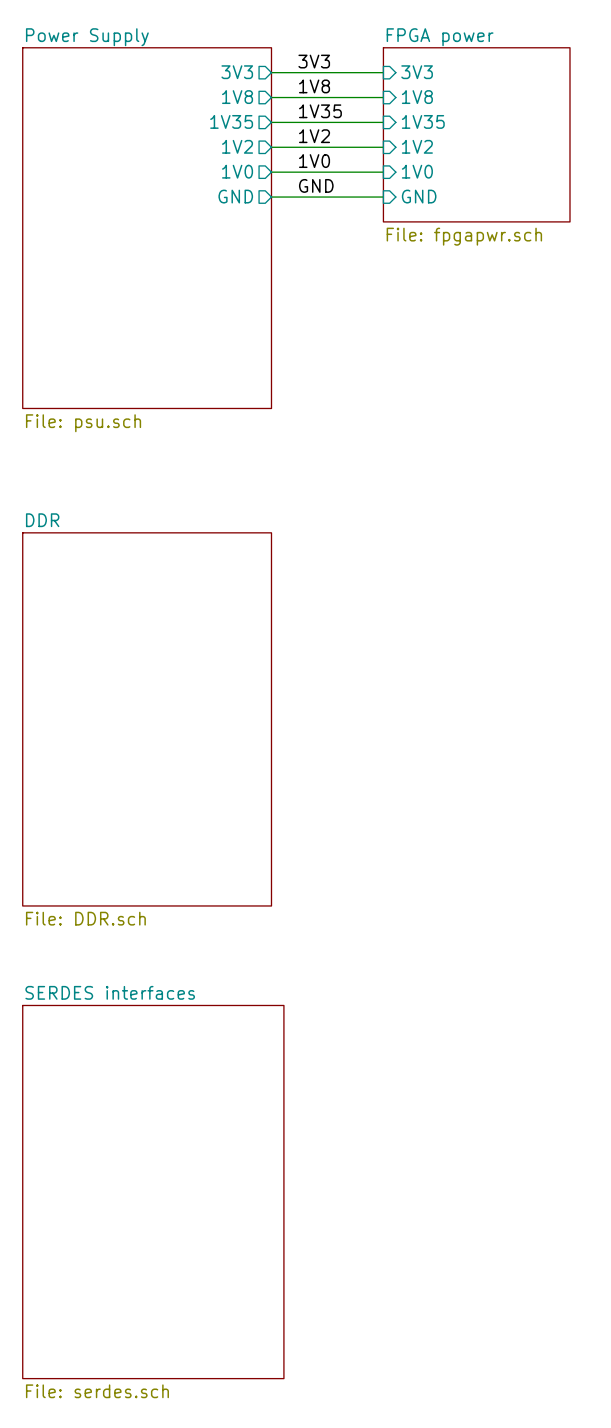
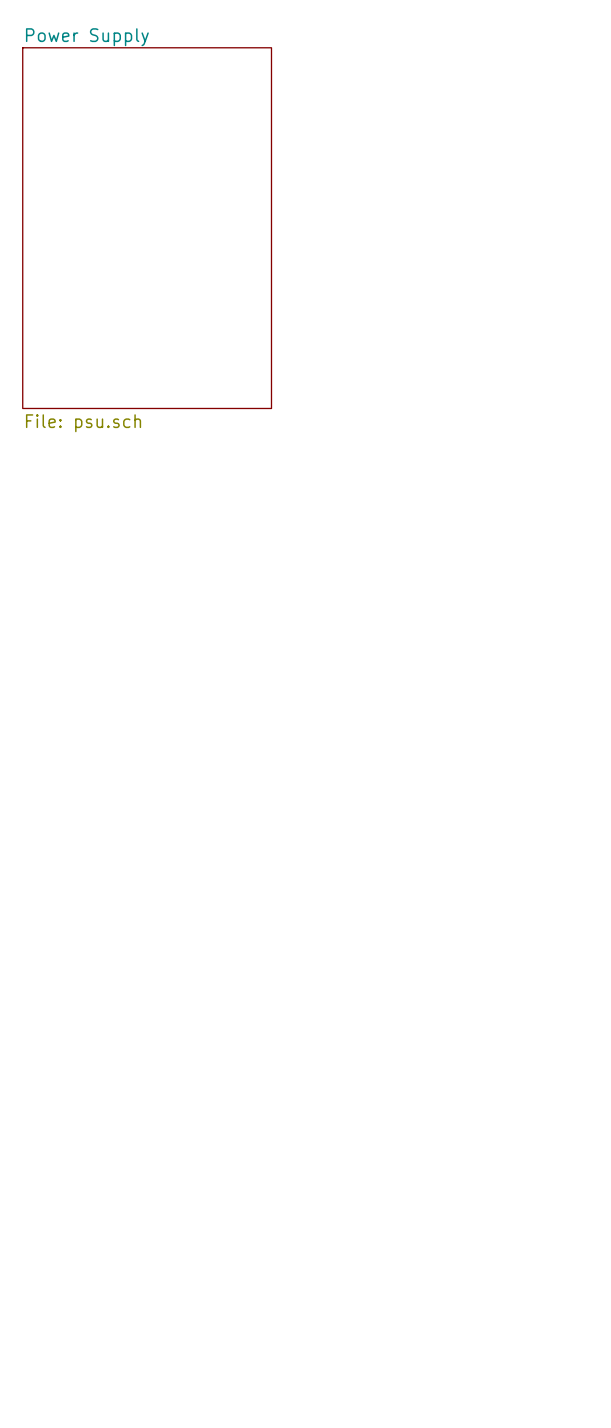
label: 3V3 (314, 61) -> none
sheet pin: 3V3 (237, 72) -> none
wire: (271, 72) (383, 72) -> none
sheet pin: 3V3 (417, 72) -> none
label: 1V8 (314, 86) -> none
sheet pin: 1V8 (237, 97) -> none
wire: (271, 97) (383, 97) -> none
sheet pin: 1V8 (417, 97) -> none
label: 1V35 (320, 111) -> none
sheet pin: 1V35 (231, 121) -> none
sheet pin: 1V35 (423, 121) -> none
wire: (271, 122) (383, 122) -> none
sheet FPGA power: File: fpgapwr.sch (476, 134) -> none
label: 1V2 (314, 136) -> none
sheet pin: 1V2 (237, 146) -> none
sheet pin: 1V2 (417, 146) -> none
wire: (271, 147) (383, 147) -> none
label: 1V0 (314, 161) -> none
sheet pin: 1V0 (237, 171) -> none
sheet pin: 1V0 (417, 171) -> none
wire: (271, 172) (383, 172) -> none
label: GND (316, 185) -> none
sheet pin: GND (235, 196) -> none
sheet pin: GND (419, 196) -> none
wire: (271, 197) (383, 197) -> none
sheet DDR: File: DDR.sch (147, 719) -> none
sheet SERDES interfaces: File: serdes.sch (153, 1192) -> none

